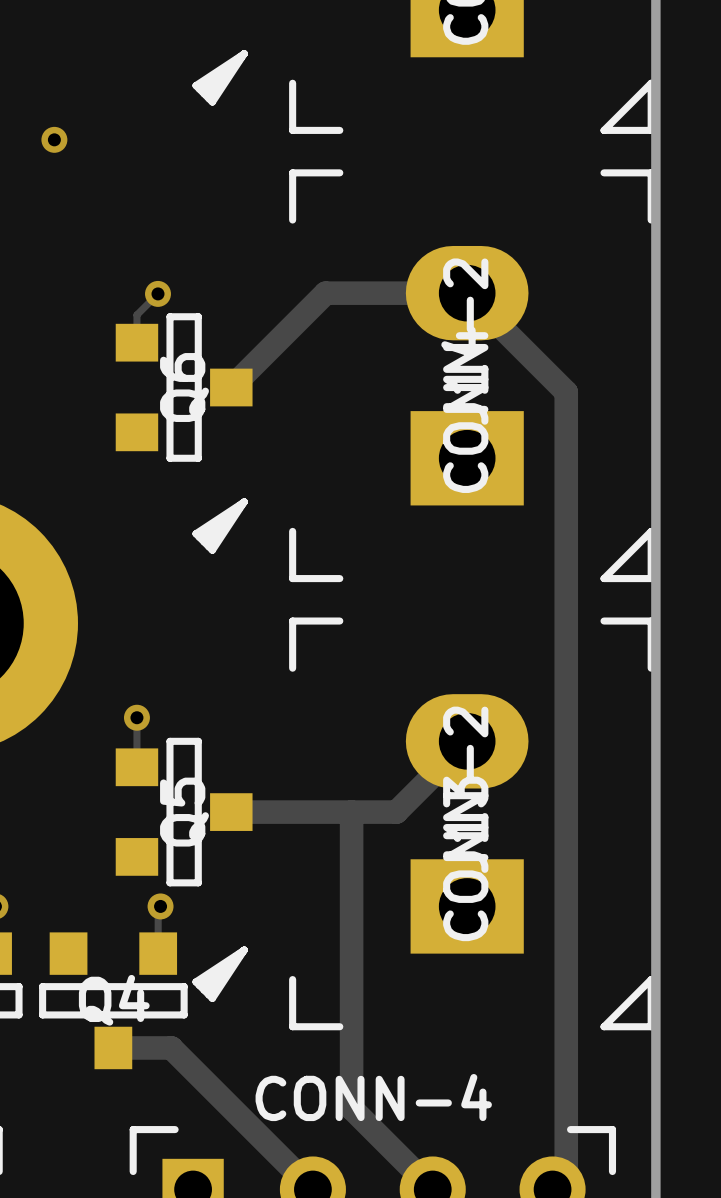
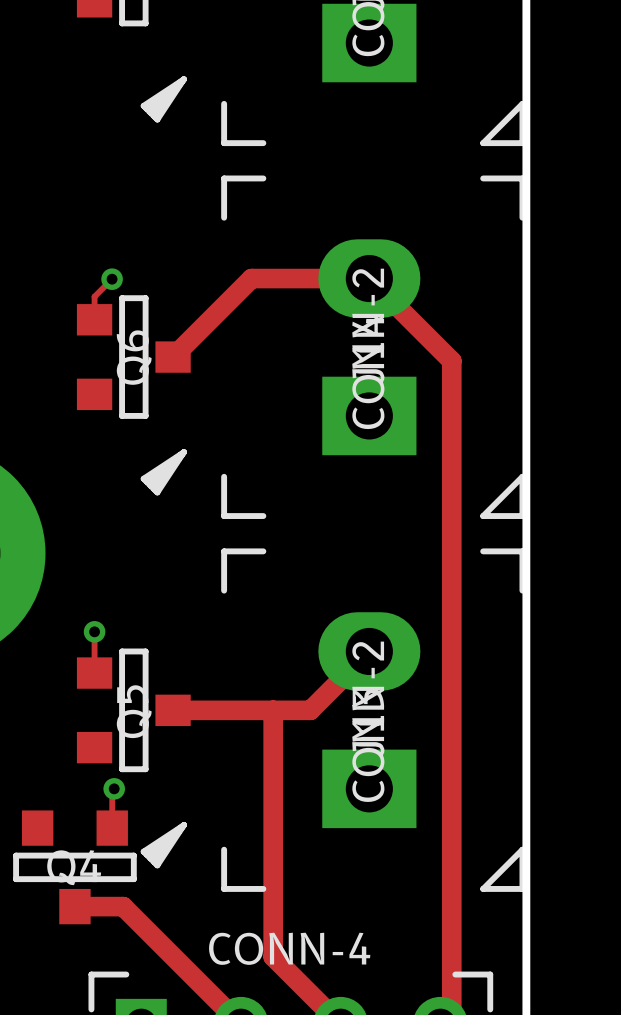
via: (54, 139) -> none

